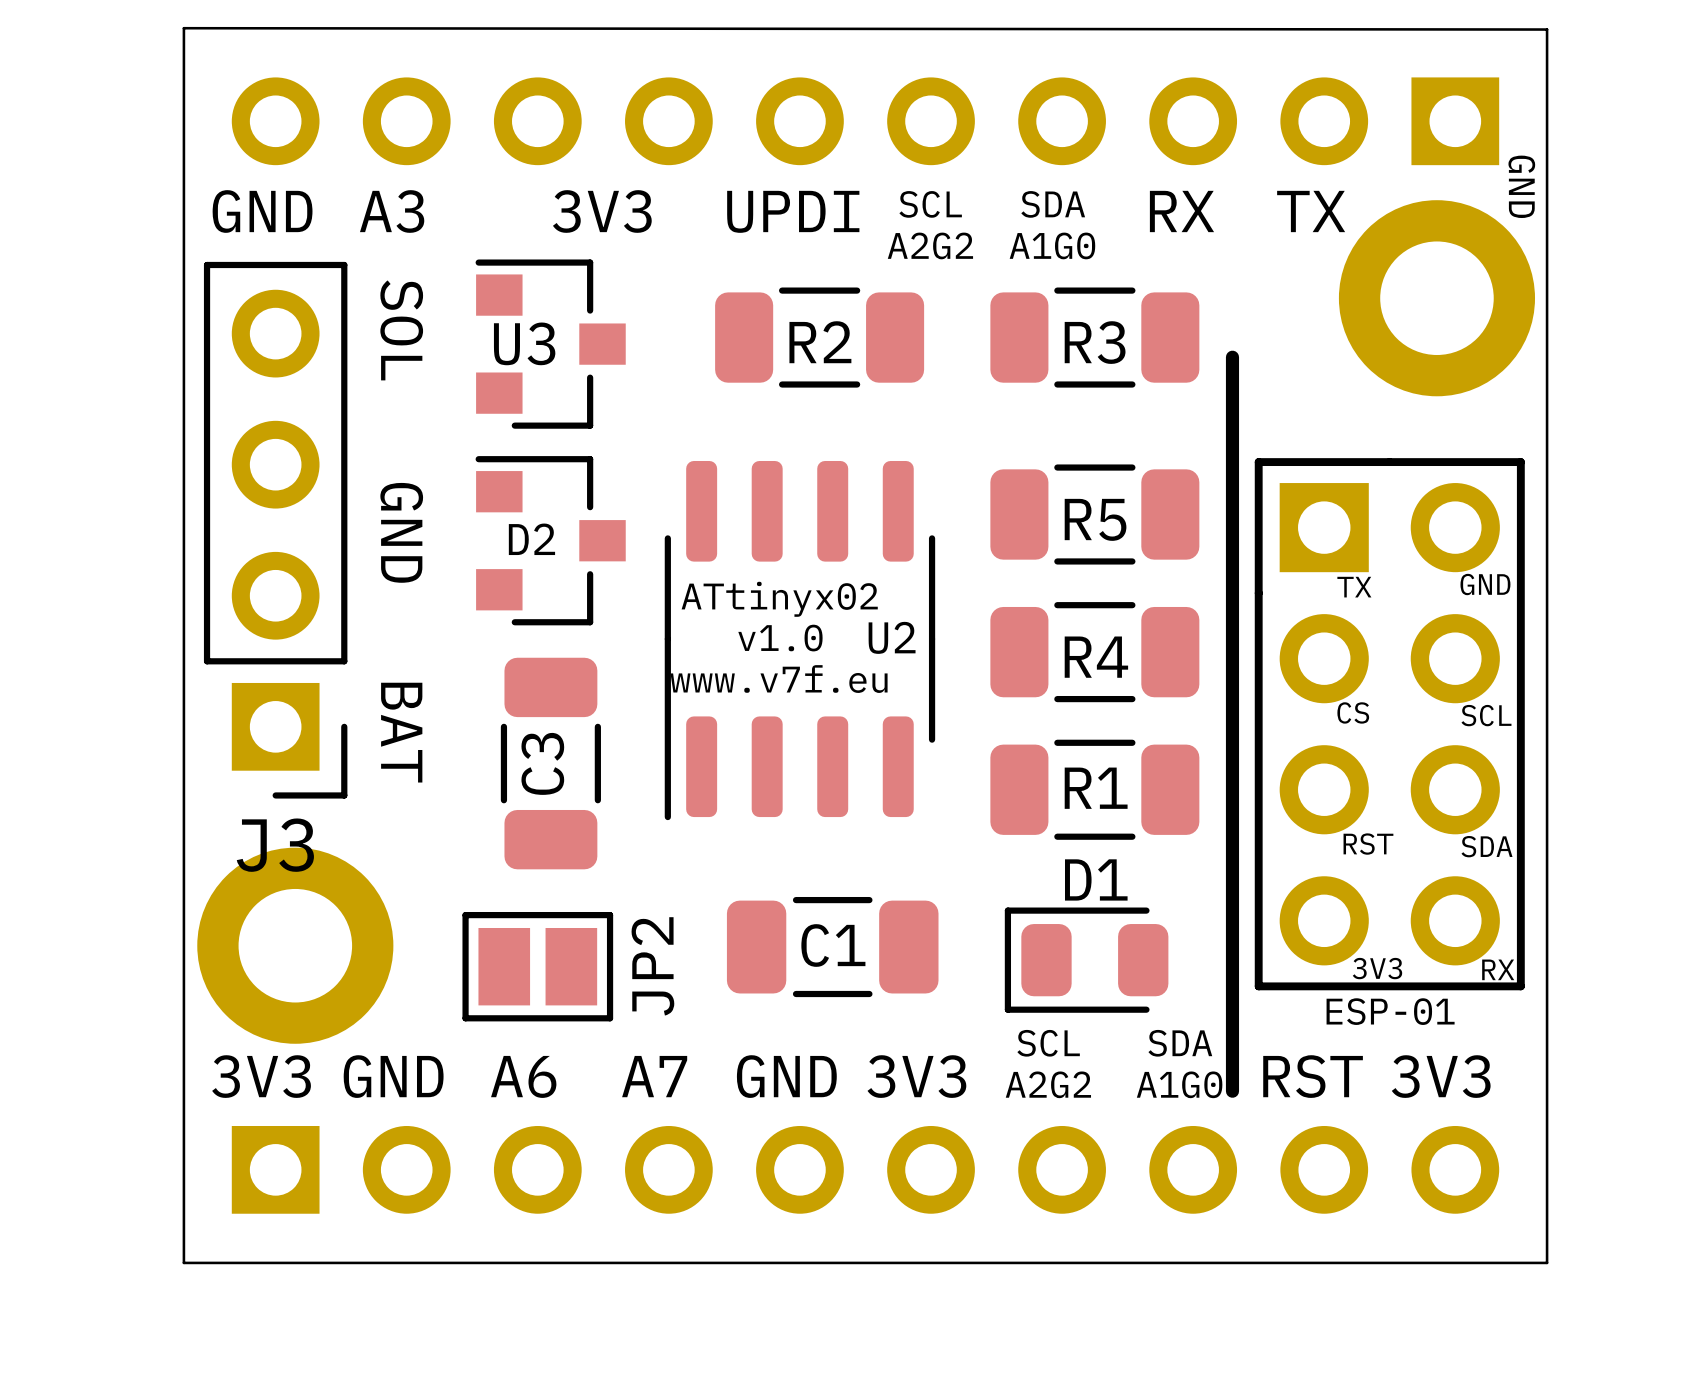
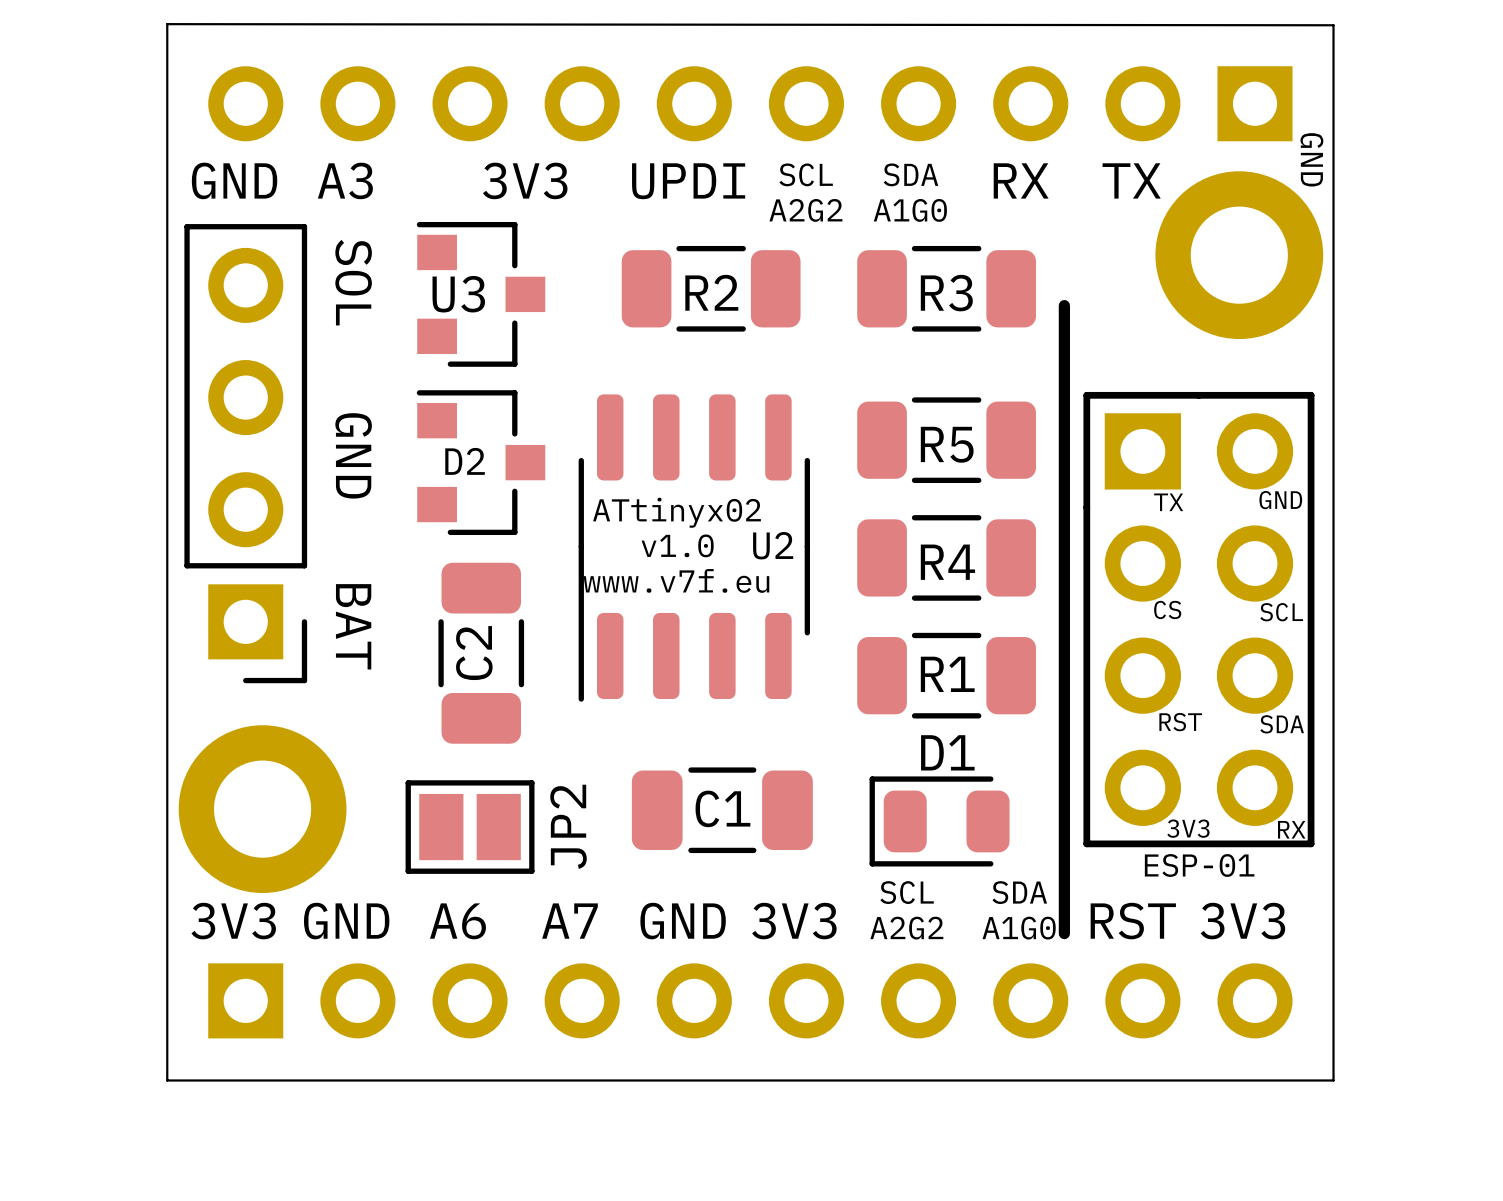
C3 name: C3 (542, 763) -> C2 (474, 653)
J3 name: J3 (275, 845) -> none

